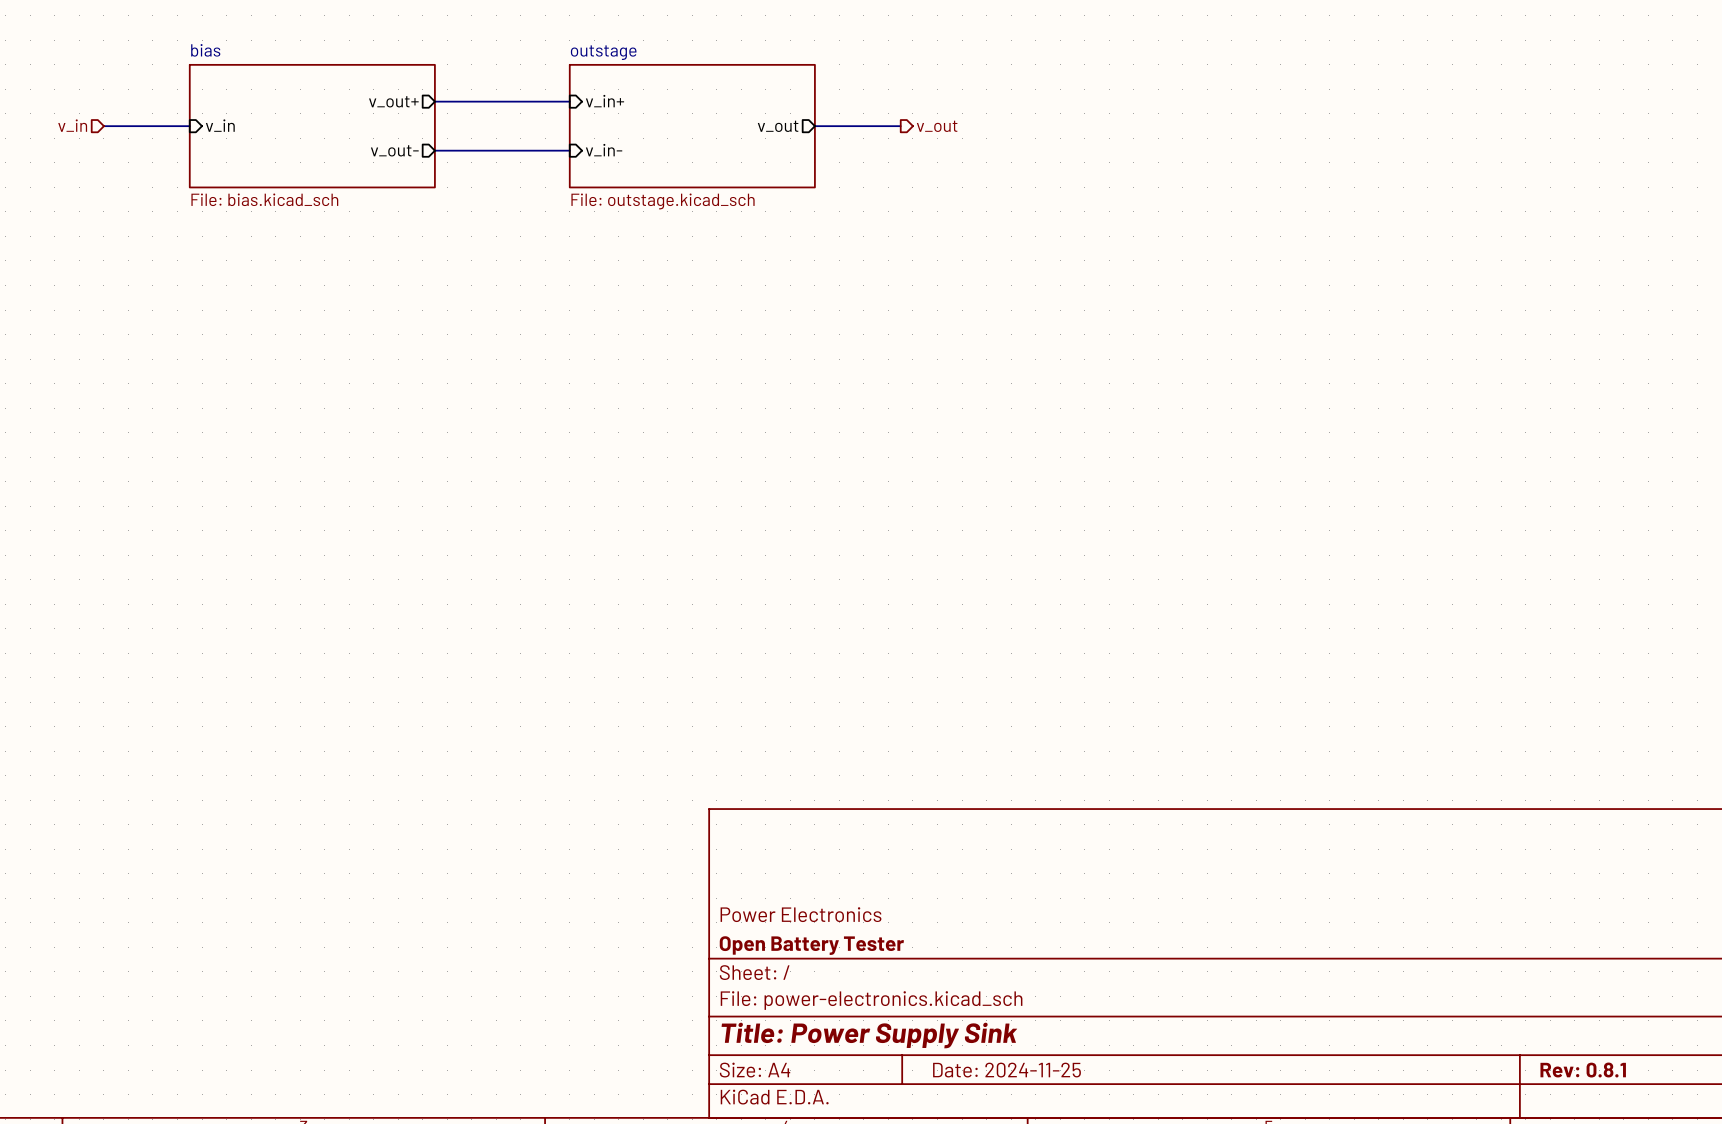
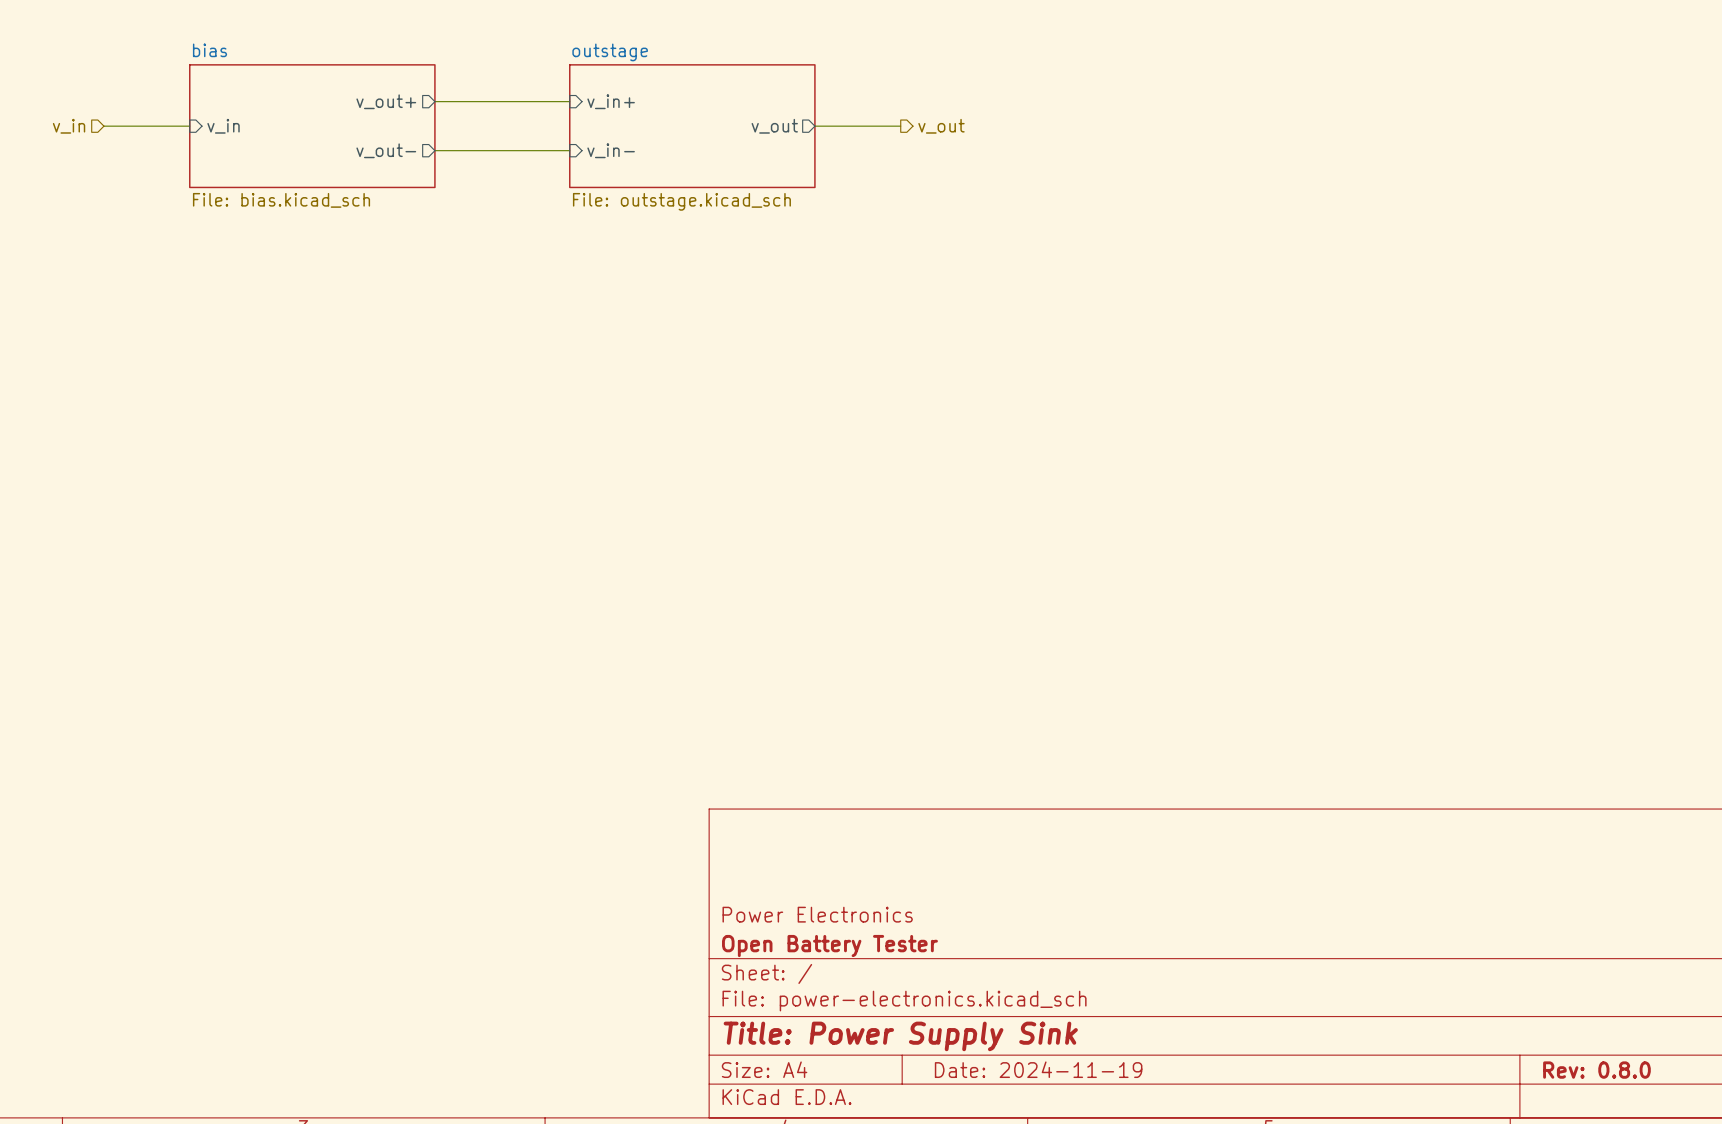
title block: Date: 2024-11-25 (1006, 1070) -> Date: 2024-11-19 (1038, 1069)
title block: Rev: 0.8.1 (1583, 1070) -> Rev: 0.8.0 (1596, 1070)

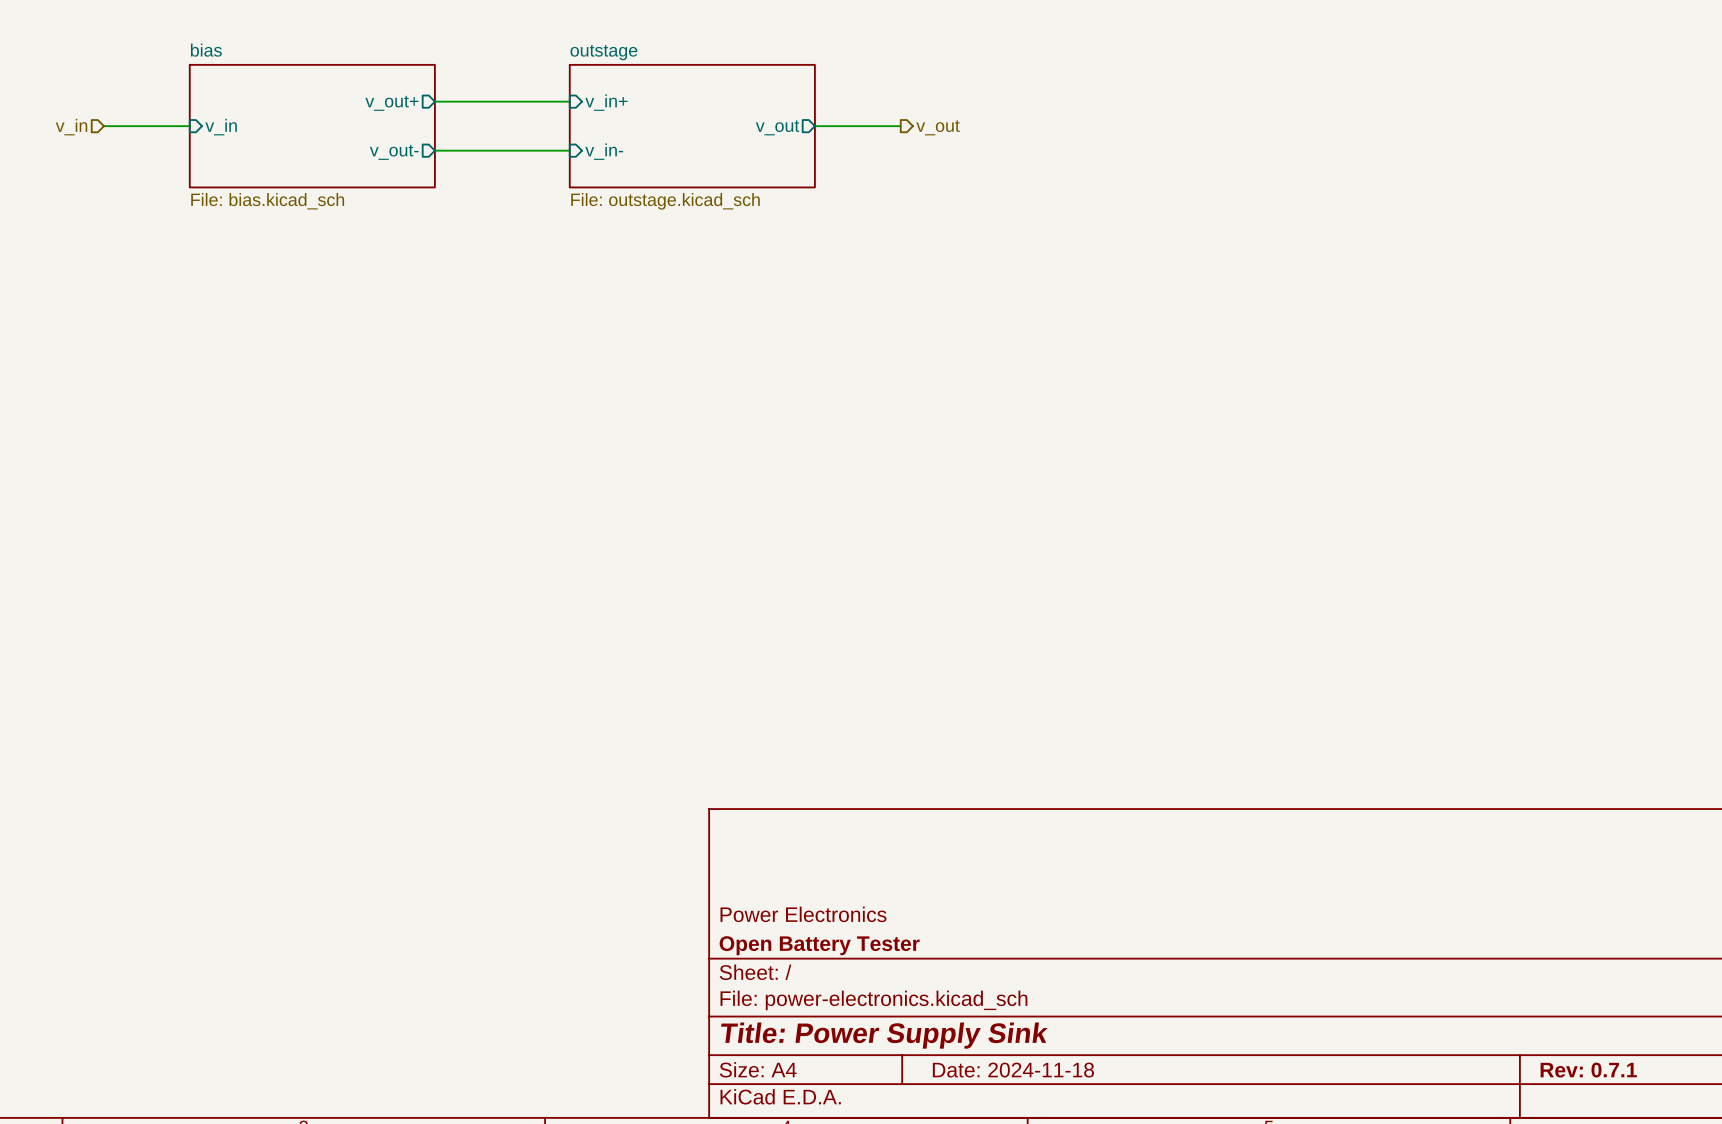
title block: Date: 2024-11-19 (1038, 1069) -> Date: 2024-11-18 (1013, 1070)
title block: Rev: 0.8.0 (1596, 1070) -> Rev: 0.7.1 (1588, 1070)

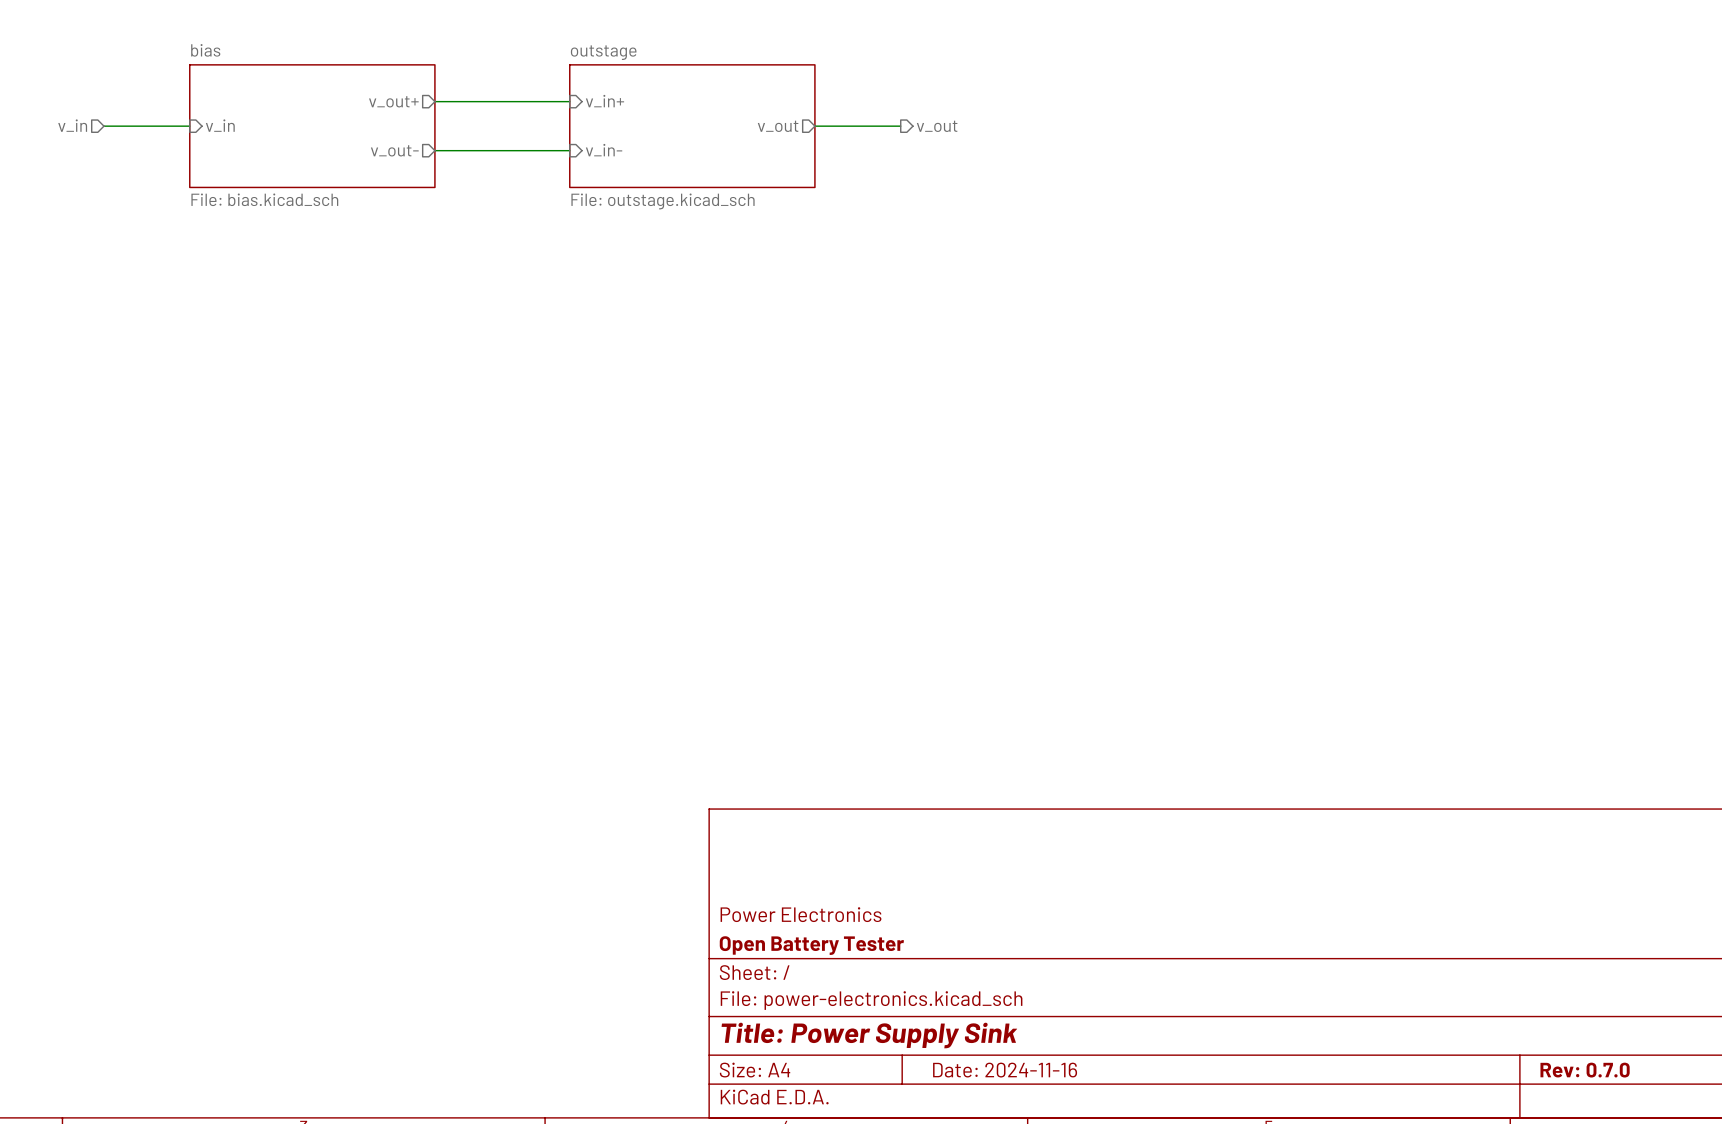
title block: Date: 2024-11-18 (1013, 1070) -> Date: 2024-11-16 (1005, 1070)
title block: Rev: 0.7.1 (1588, 1070) -> Rev: 0.7.0 (1585, 1070)

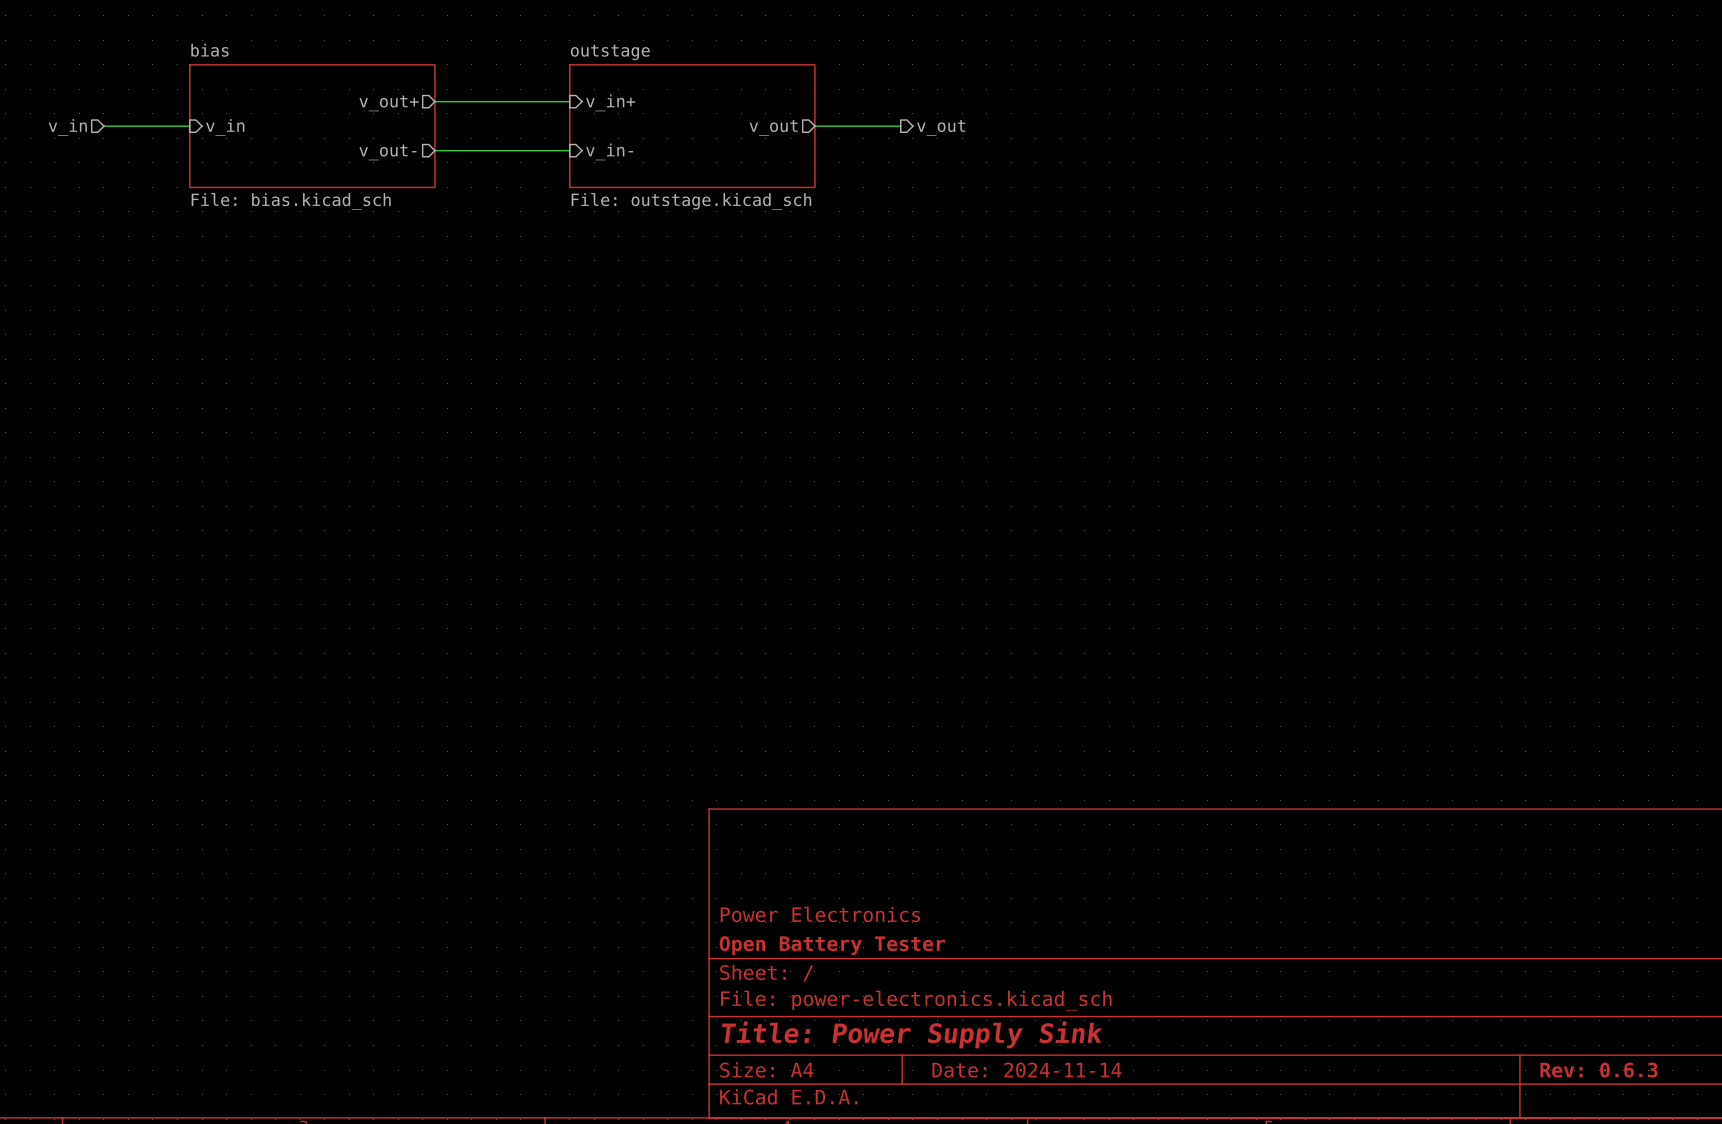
title block: Date: 2024-11-16 (1005, 1070) -> Date: 2024-11-14 (1026, 1070)
title block: Rev: 0.7.0 (1585, 1070) -> Rev: 0.6.3 (1598, 1070)

